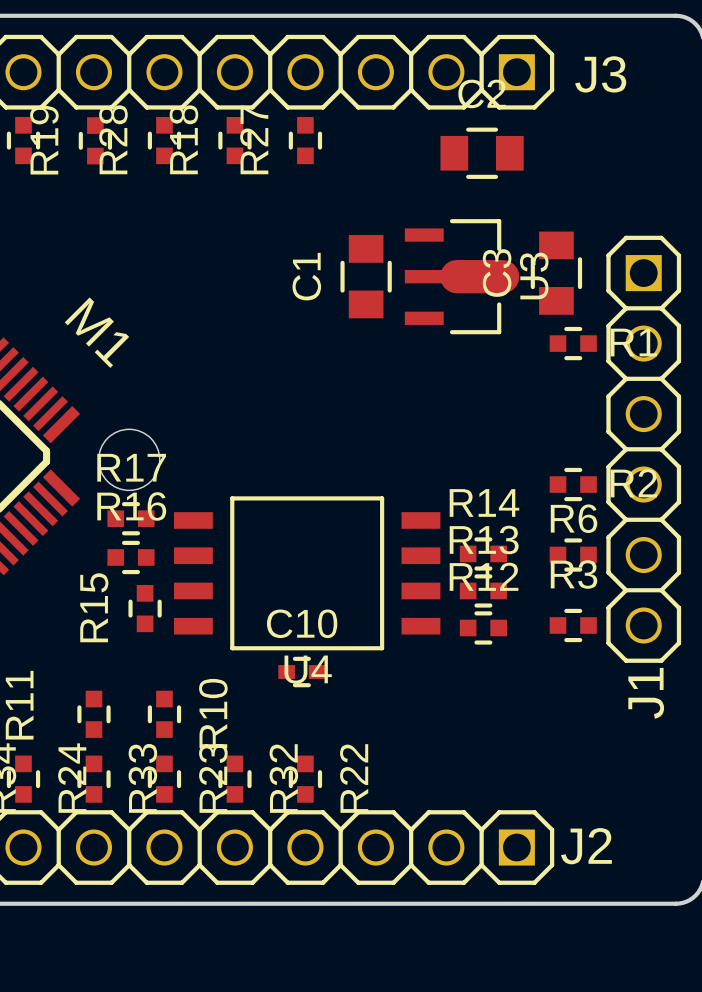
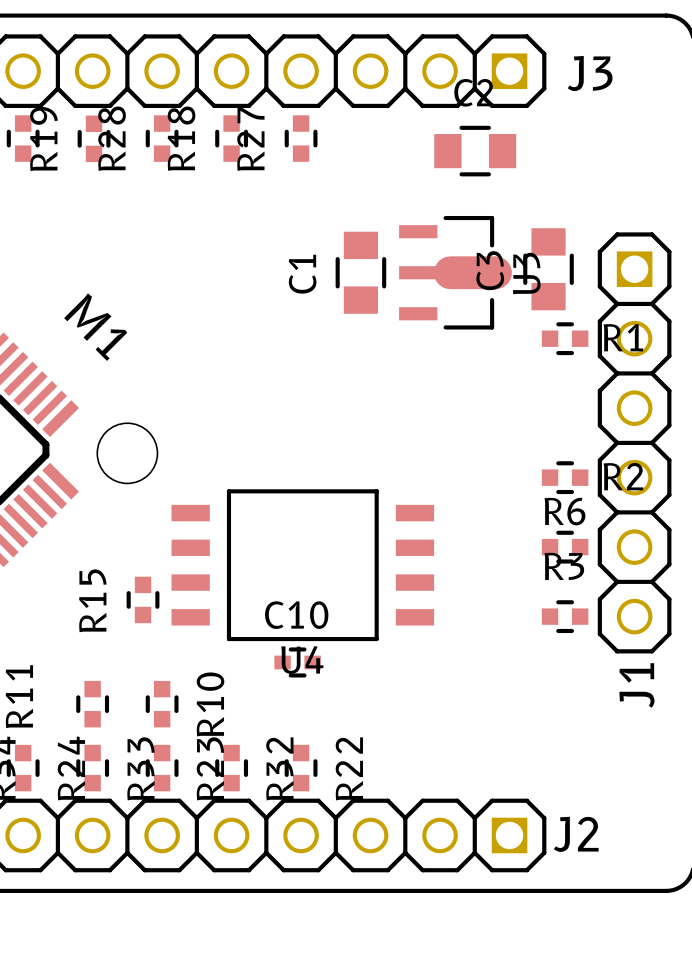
R17: (130, 518) -> none
R14: (483, 553) -> none
R16: (130, 557) -> none
R13: (483, 590) -> none
R12: (483, 627) -> none

